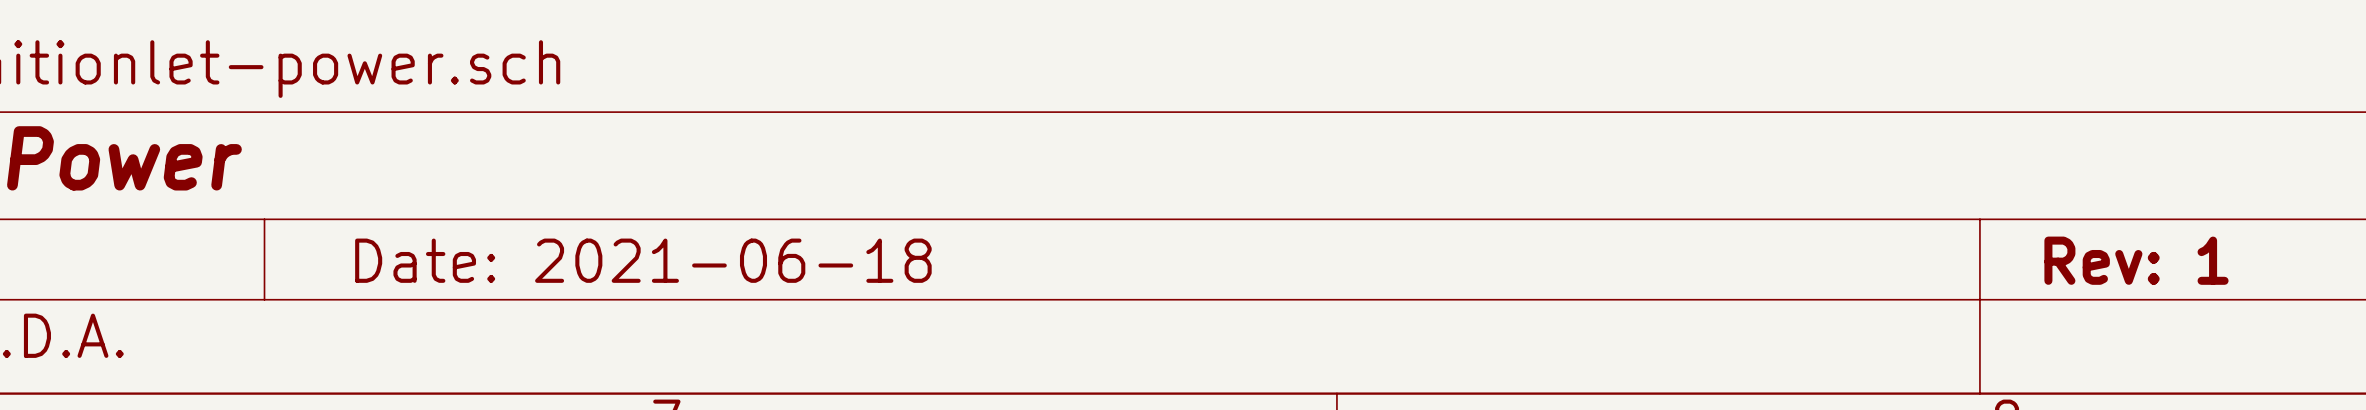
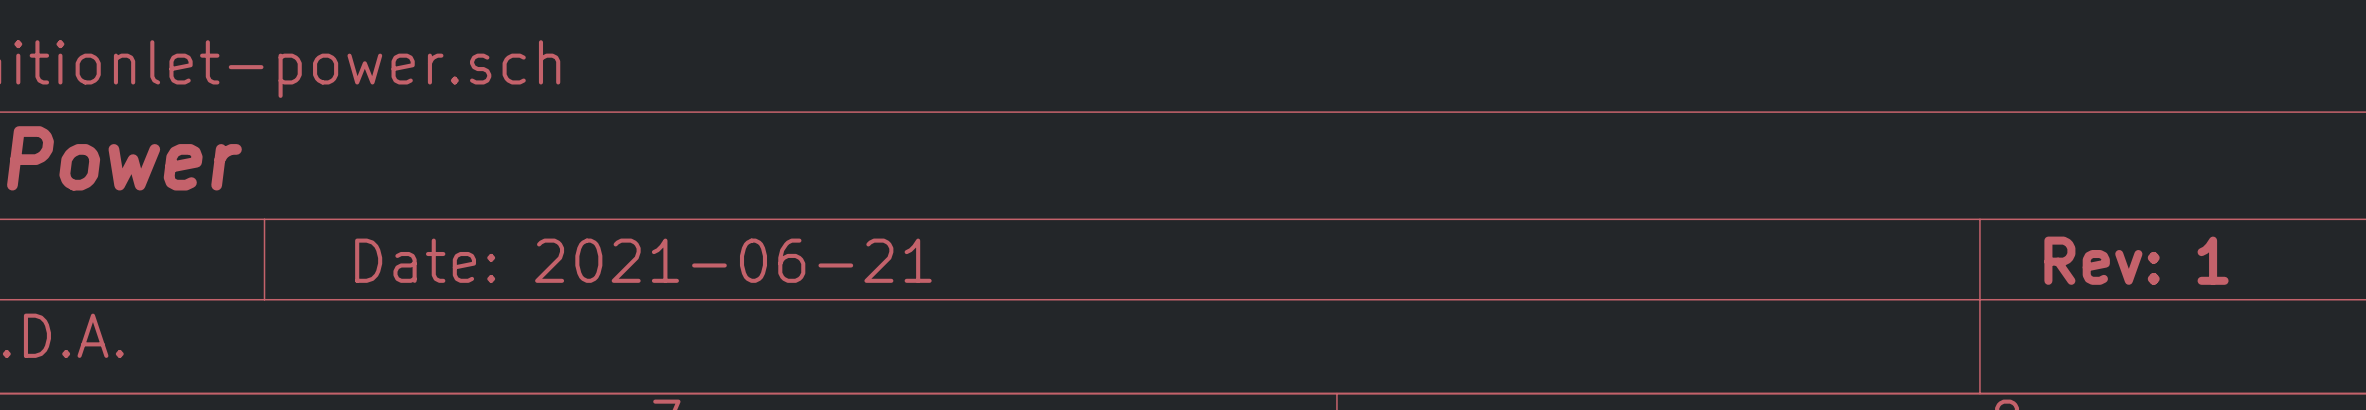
title block: Date: 2021-06-18 (643, 260) -> Date: 2021-06-21 (643, 260)

